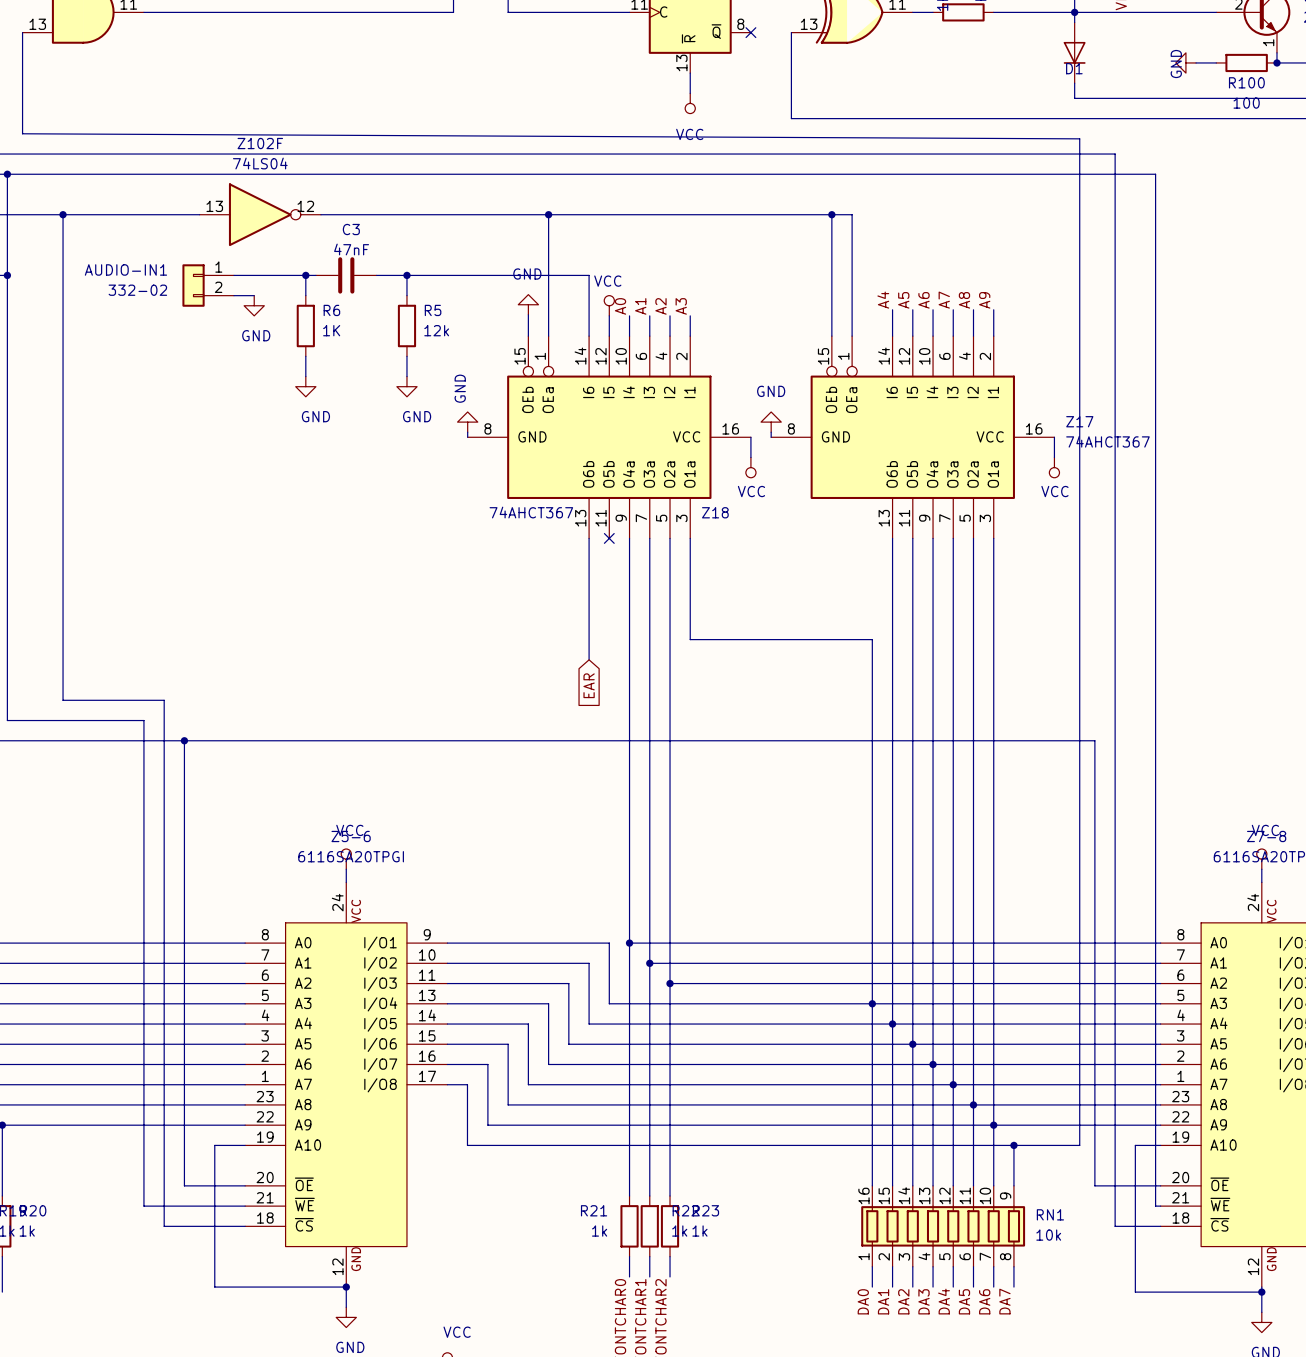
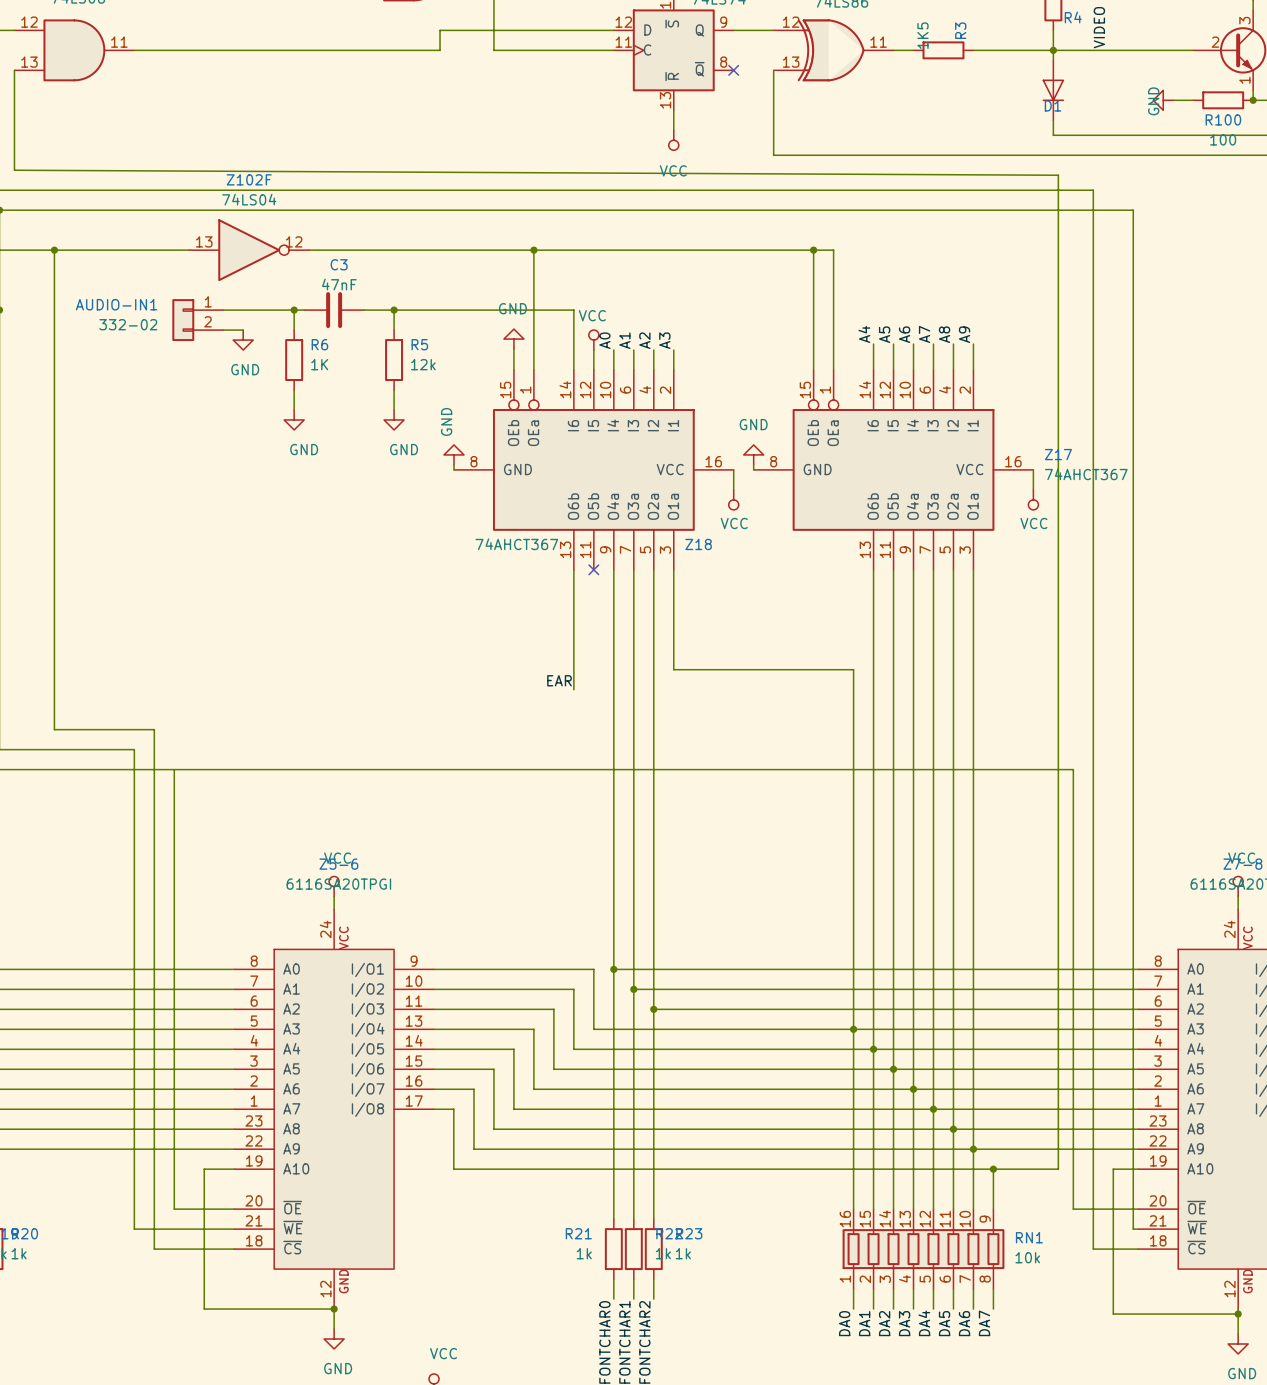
label: none -> EAR (559, 680)
global label: EAR (589, 685) -> none
junction: (184, 740) -> none

